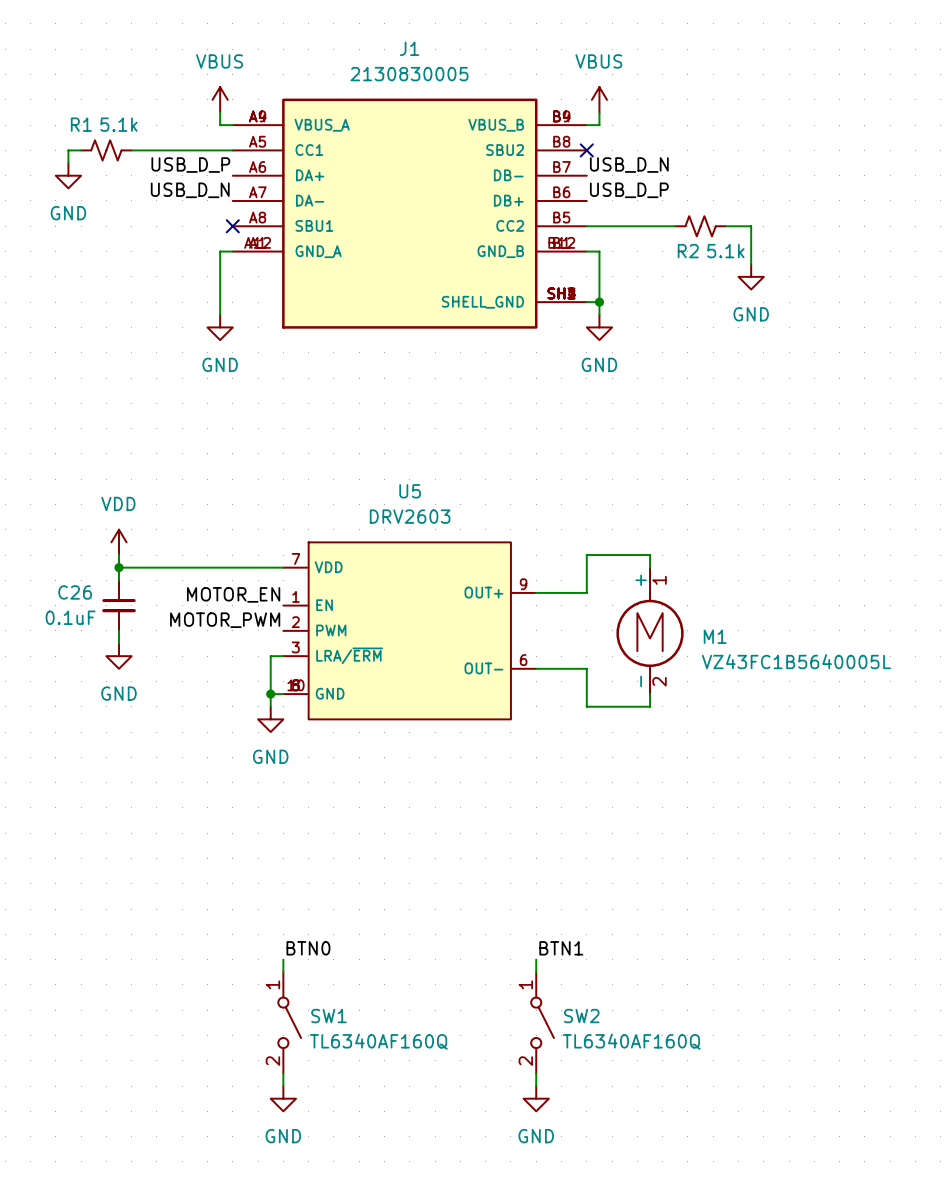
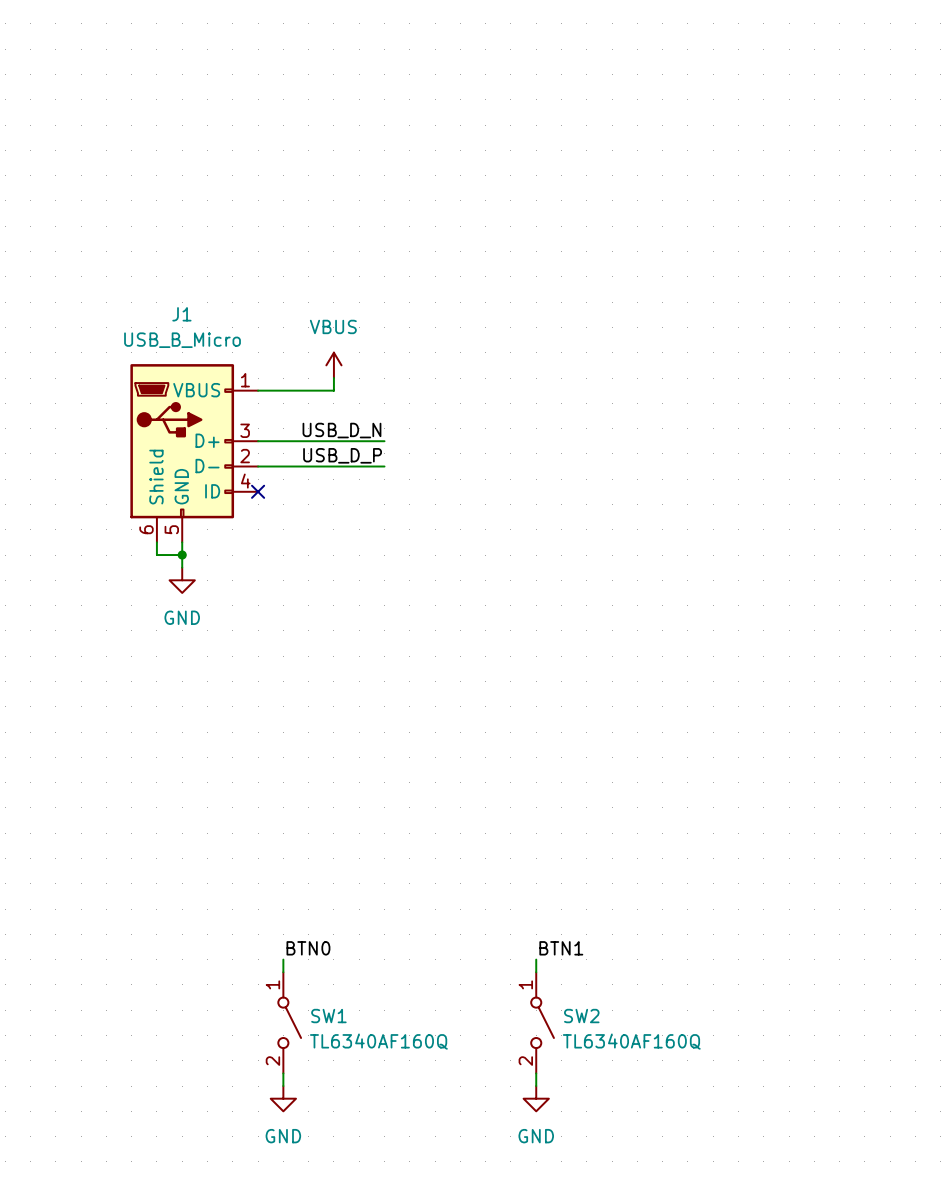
J1 name position: J1 (409, 48) -> J1 (181, 314)
J1 value: 2130830005 (409, 74) -> USB_B_Micro (182, 340)
J1 symbol: [232, 98, 587, 329] -> [130, 364, 259, 543]
power symbol: VBUS (220, 99) -> none
power symbol: VBUS (599, 99) -> none
wire: (220, 112) (220, 125) (232, 125) -> none
wire: (599, 112) (599, 125) (586, 125) -> none
wire: (81, 150) (68, 150) (68, 163) -> none
R1: 5.1k (106, 150) -> none
wire: (131, 150) (232, 150) -> none
no-connect mark: (586, 150) -> none
label: USB_D_P (190, 165) -> none
label: USB_D_N (629, 165) -> none
power symbol: GND (68, 175) -> none
label: USB_D_N (190, 190) -> none
label: USB_D_P (629, 190) -> none
no-connect mark: (232, 226) -> none
wire: (586, 226) (675, 226) -> none
R2: 5.1k (700, 226) -> none
wire: (725, 226) (751, 226) (751, 264) -> none
wire: (232, 251) (220, 251) (220, 314) -> none
wire: (586, 251) (599, 251) (599, 314) -> none
power symbol: GND (751, 276) -> none
wire: (586, 302) (599, 302) -> none
junction: (599, 302) -> none
power symbol: GND (220, 327) -> none
power symbol: GND (599, 327) -> none
power symbol: none -> VBUS (333, 365)
wire: none -> (333, 378) (333, 390) (258, 390)
label: none -> USB_D_N (341, 430)
wire: none -> (258, 441) (384, 441)
label: none -> USB_D_P (342, 455)
wire: none -> (258, 466) (384, 466)
no-connect mark: none -> (258, 491)
power symbol: VDD (118, 542) -> none
wire: none -> (156, 542) (156, 555) (182, 555)
wire: (118, 555) (118, 580) -> (182, 542) (182, 567)
junction: none -> (182, 555)
wire: (118, 567) (283, 567) -> none
junction: (118, 567) -> none
wire: (650, 567) (650, 555) (586, 555) (586, 592) (536, 592) -> none
power symbol: none -> GND (182, 580)
label: MOTOR_EN (233, 594) -> none
C26: 0.1uF (118, 605) -> none
label: MOTOR_PWM (225, 620) -> none
wire: (118, 630) (118, 643) -> none
U5: DRV2603 (409, 630) -> none
M1: VZ43FC1B5640005L (650, 630) -> none
power symbol: GND (118, 656) -> none
wire: (283, 656) (270, 656) (270, 706) -> none
wire: (536, 668) (586, 668) (586, 706) (650, 706) (650, 694) -> none
wire: (270, 694) (283, 694) -> none
junction: (270, 694) -> none
power symbol: GND (270, 719) -> none

